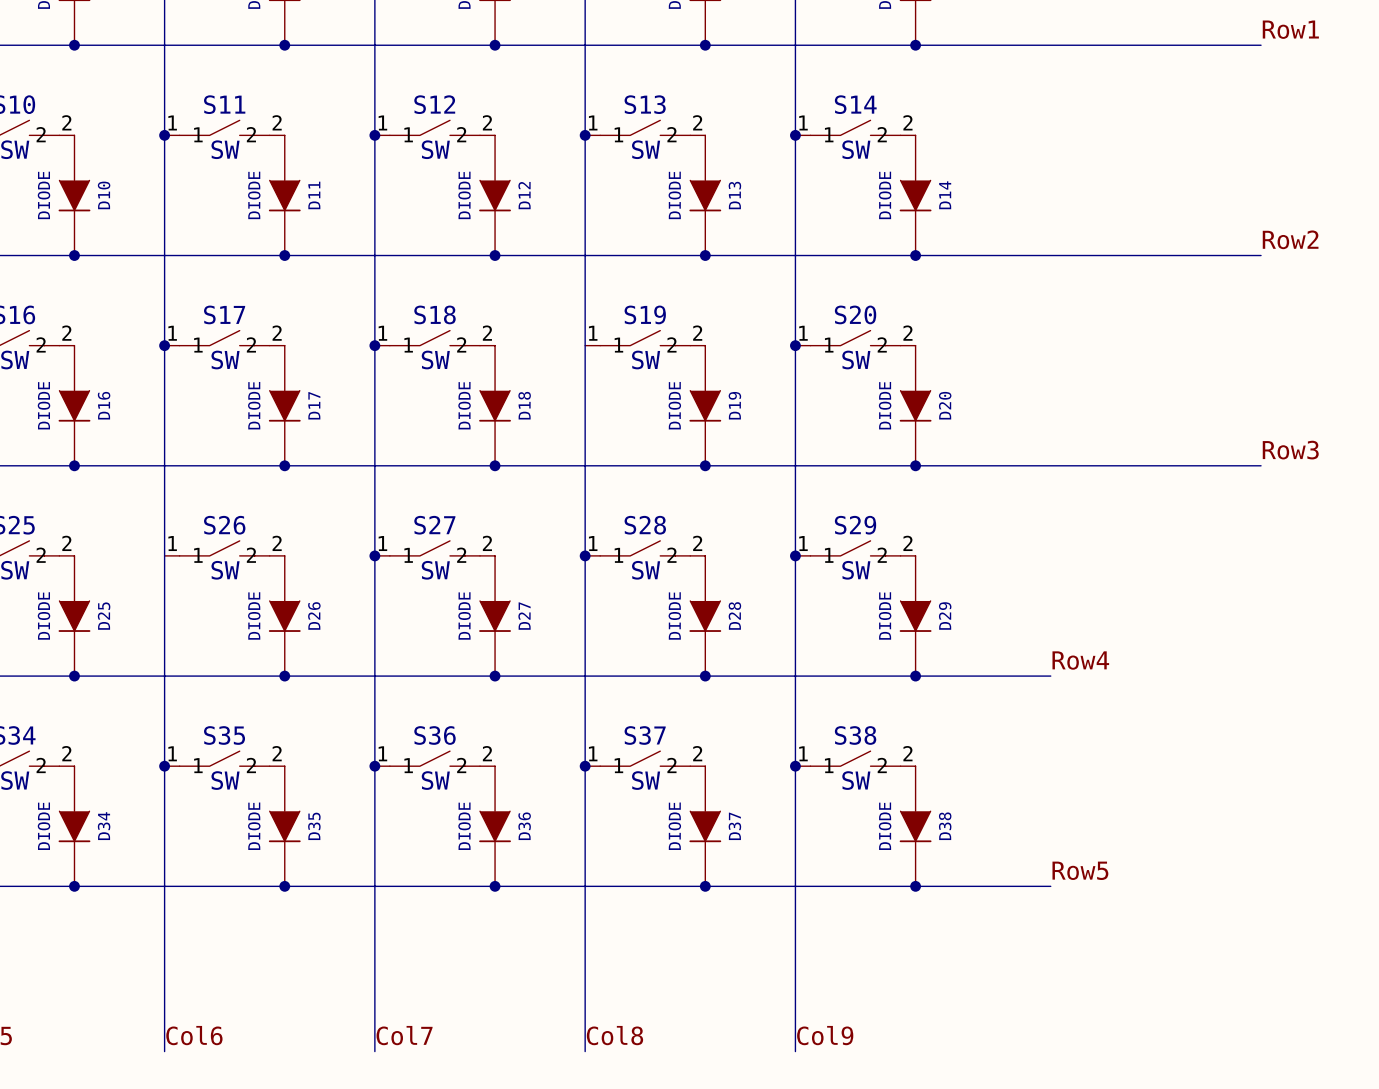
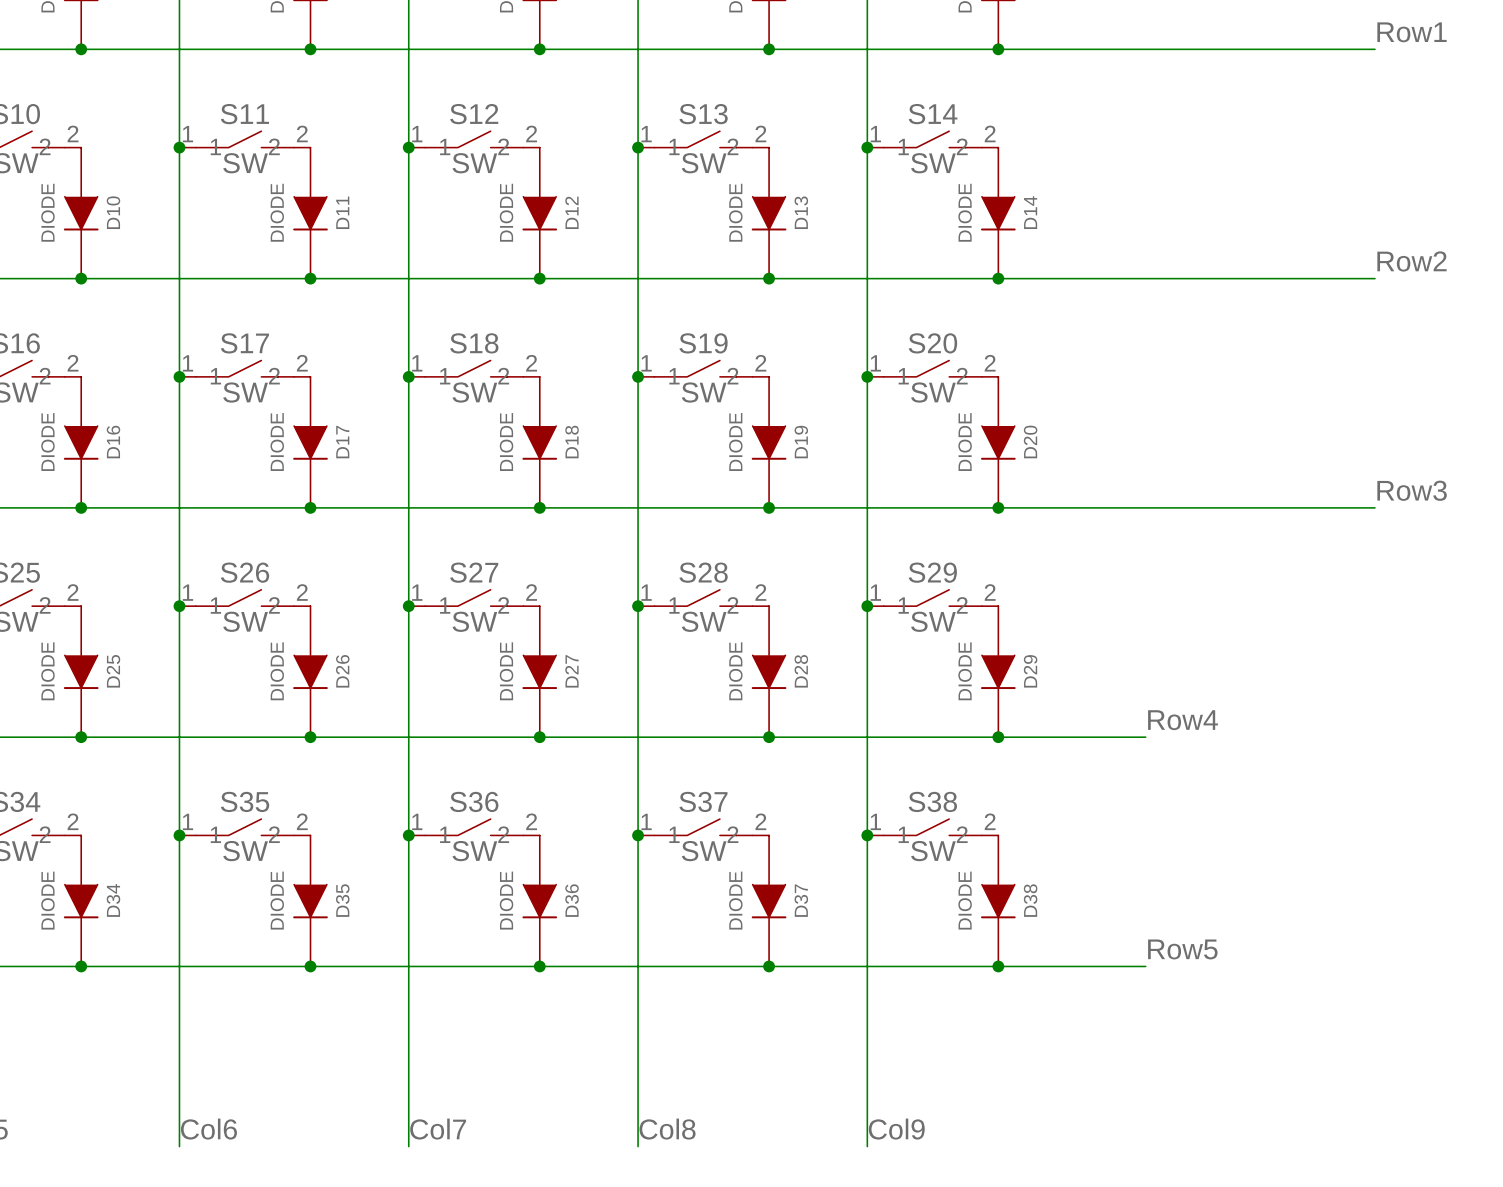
junction: none -> (638, 376)
junction: none -> (179, 606)

